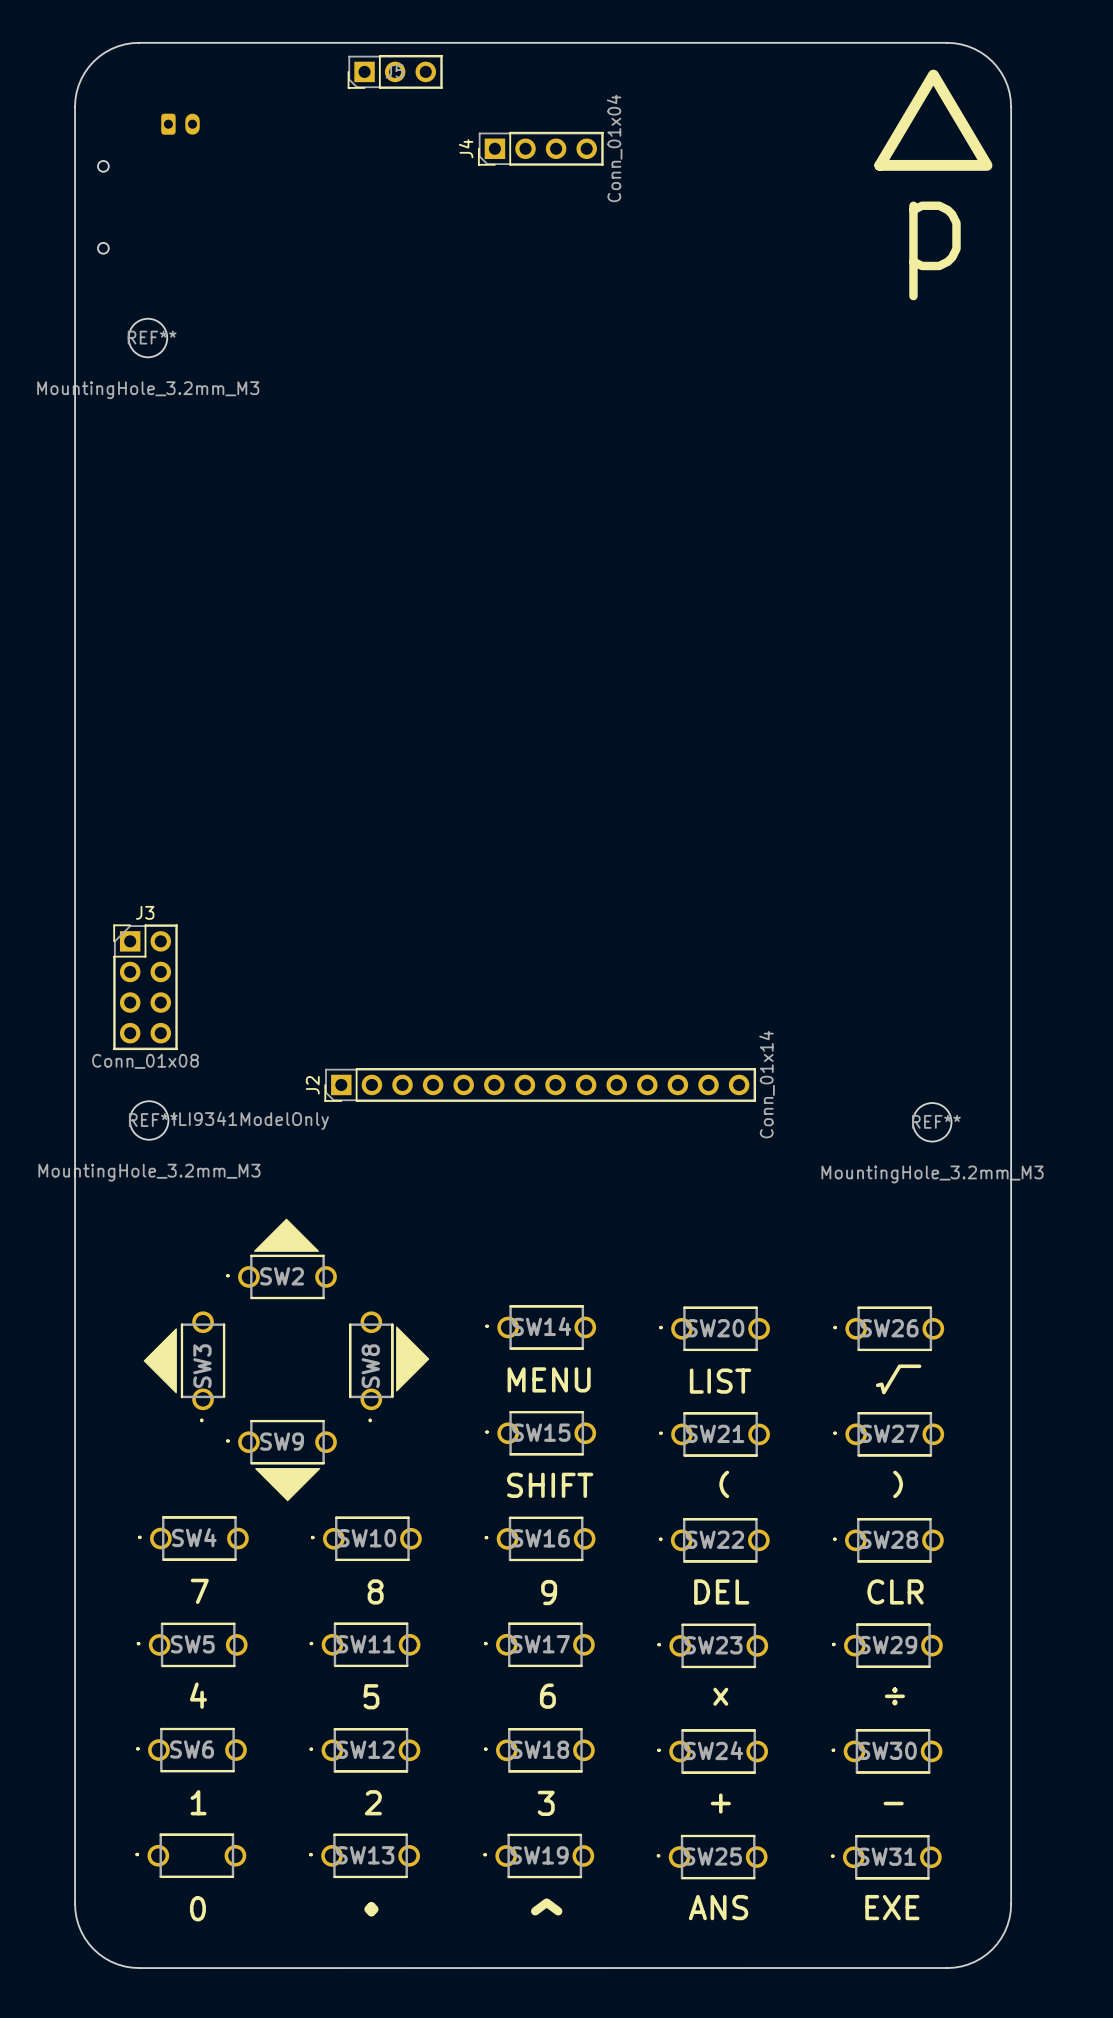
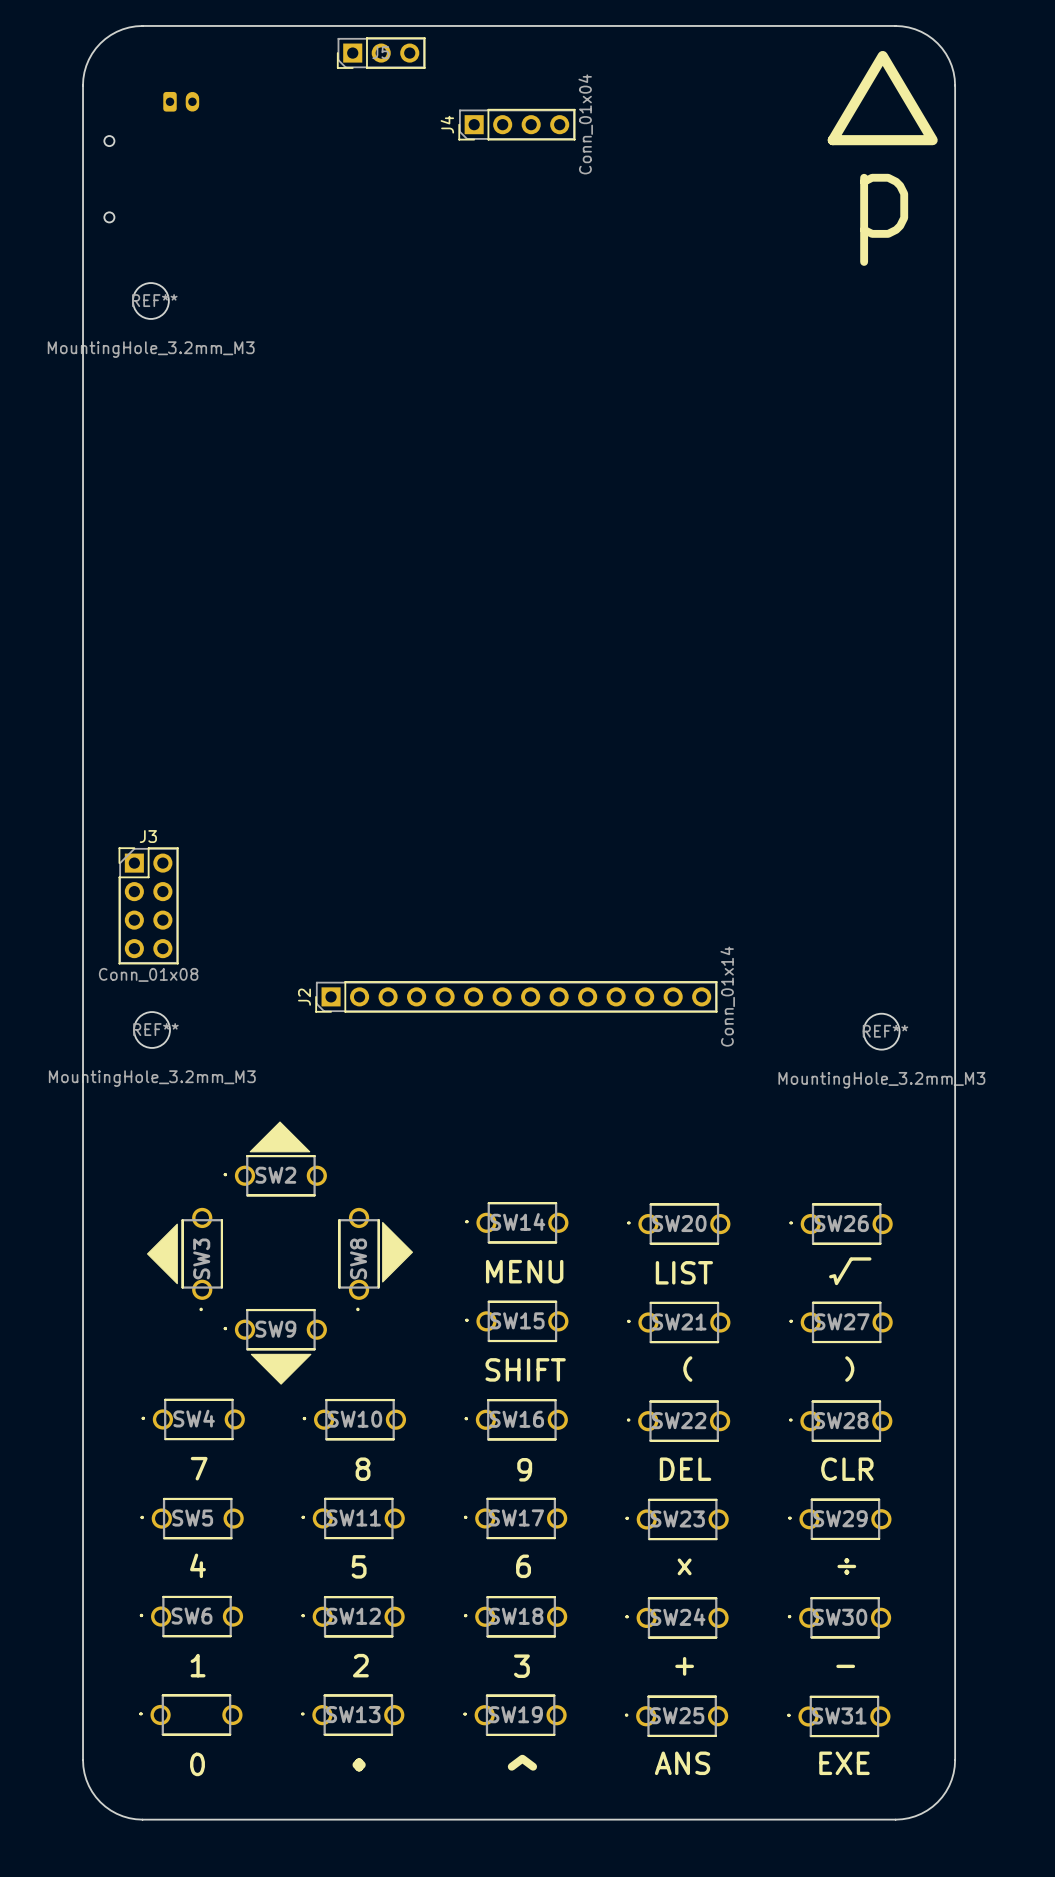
drawing: [173, 1111, 329, 1131] -> none

